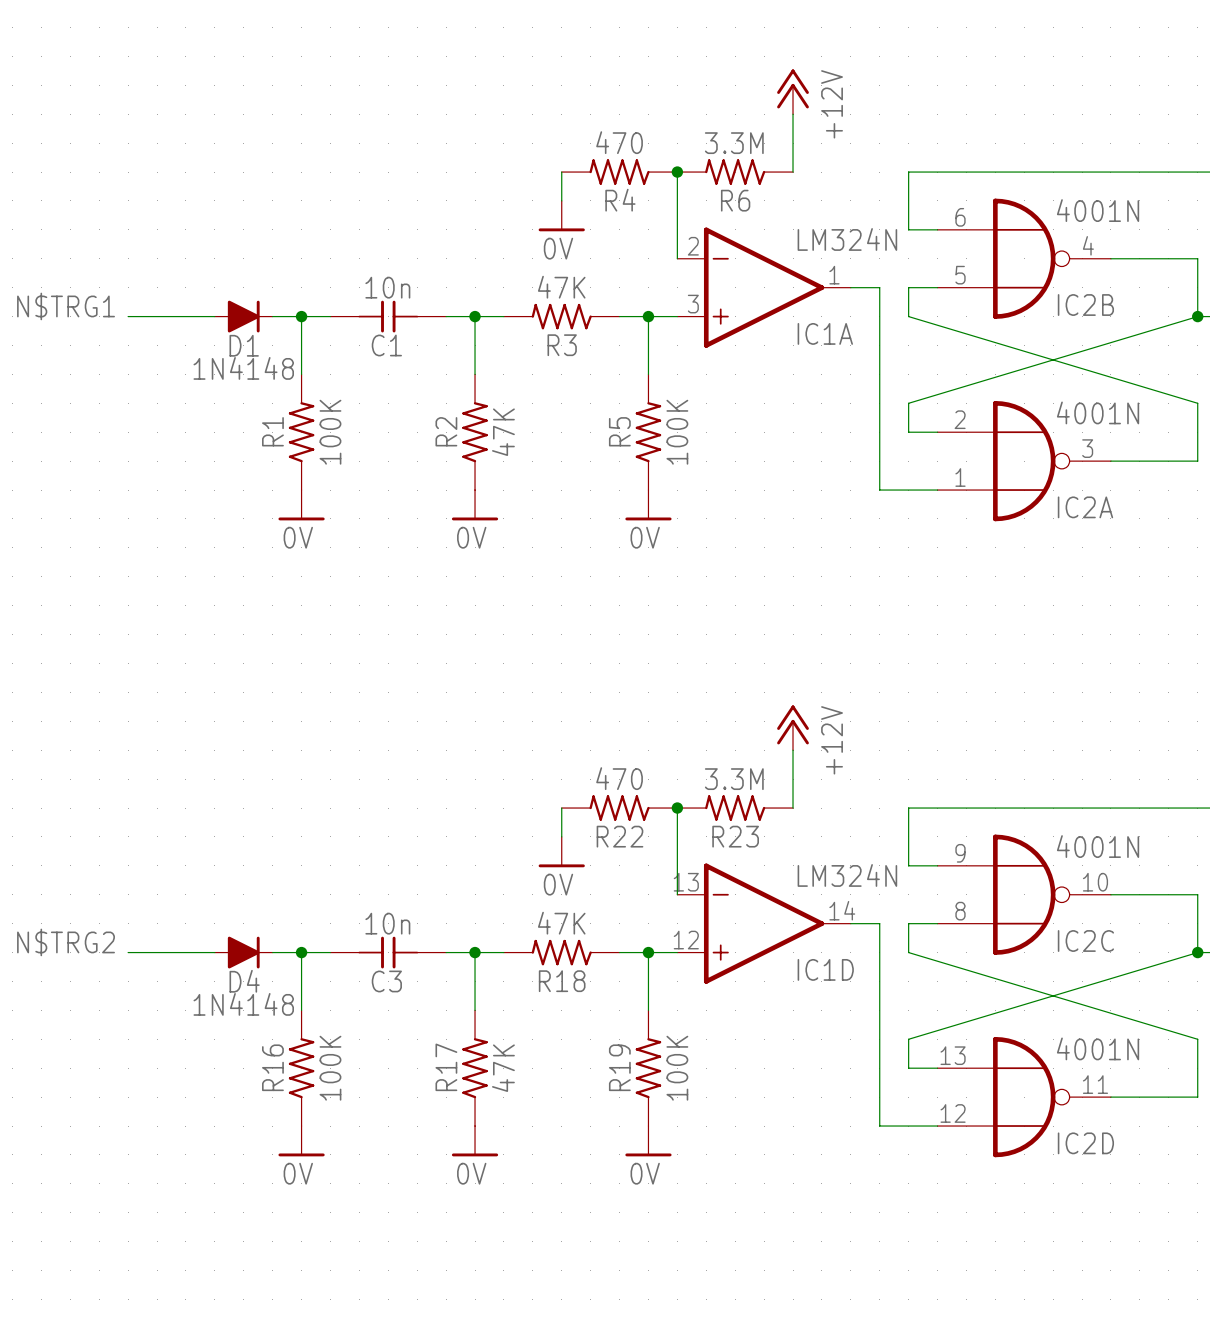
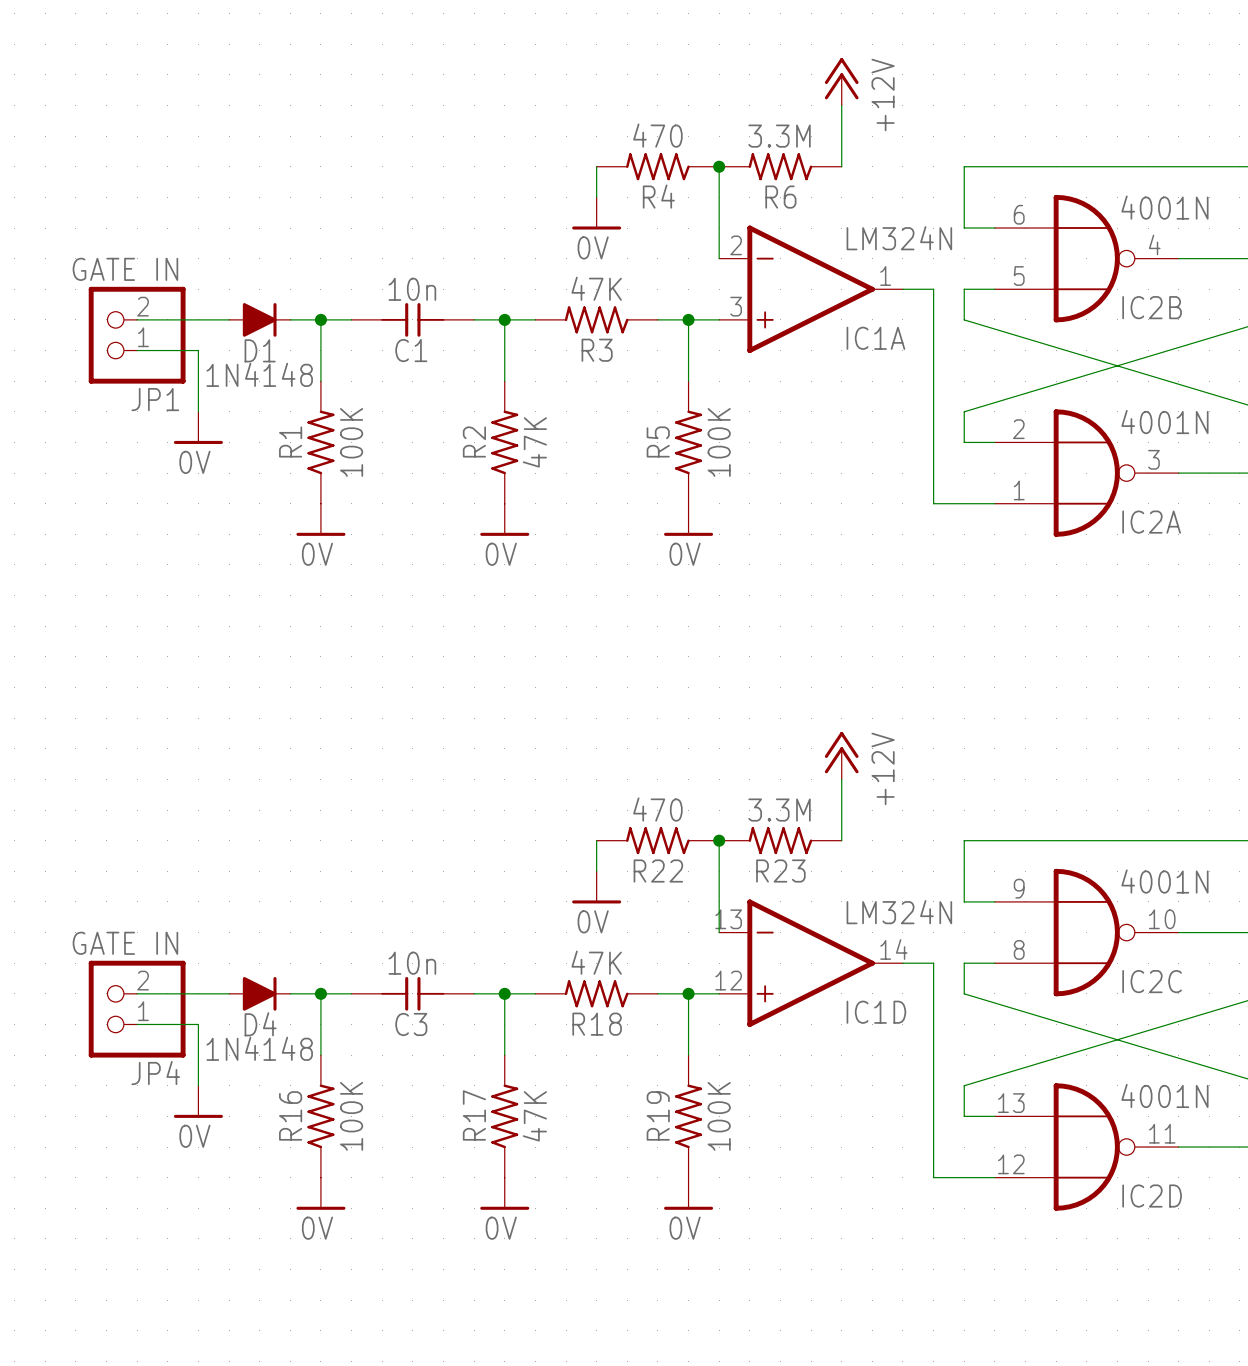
label: N$TRG1 (66, 306) -> none
JP1: none -> GATE IN (137, 335)
wire: none -> (137, 350) (198, 350) (198, 411)
power symbol: none -> 0V (198, 427)
label: N$TRG2 (66, 942) -> none
JP4: none -> GATE IN (137, 1009)
wire: none -> (137, 1024) (198, 1024) (198, 1085)
power symbol: none -> 0V (198, 1101)

